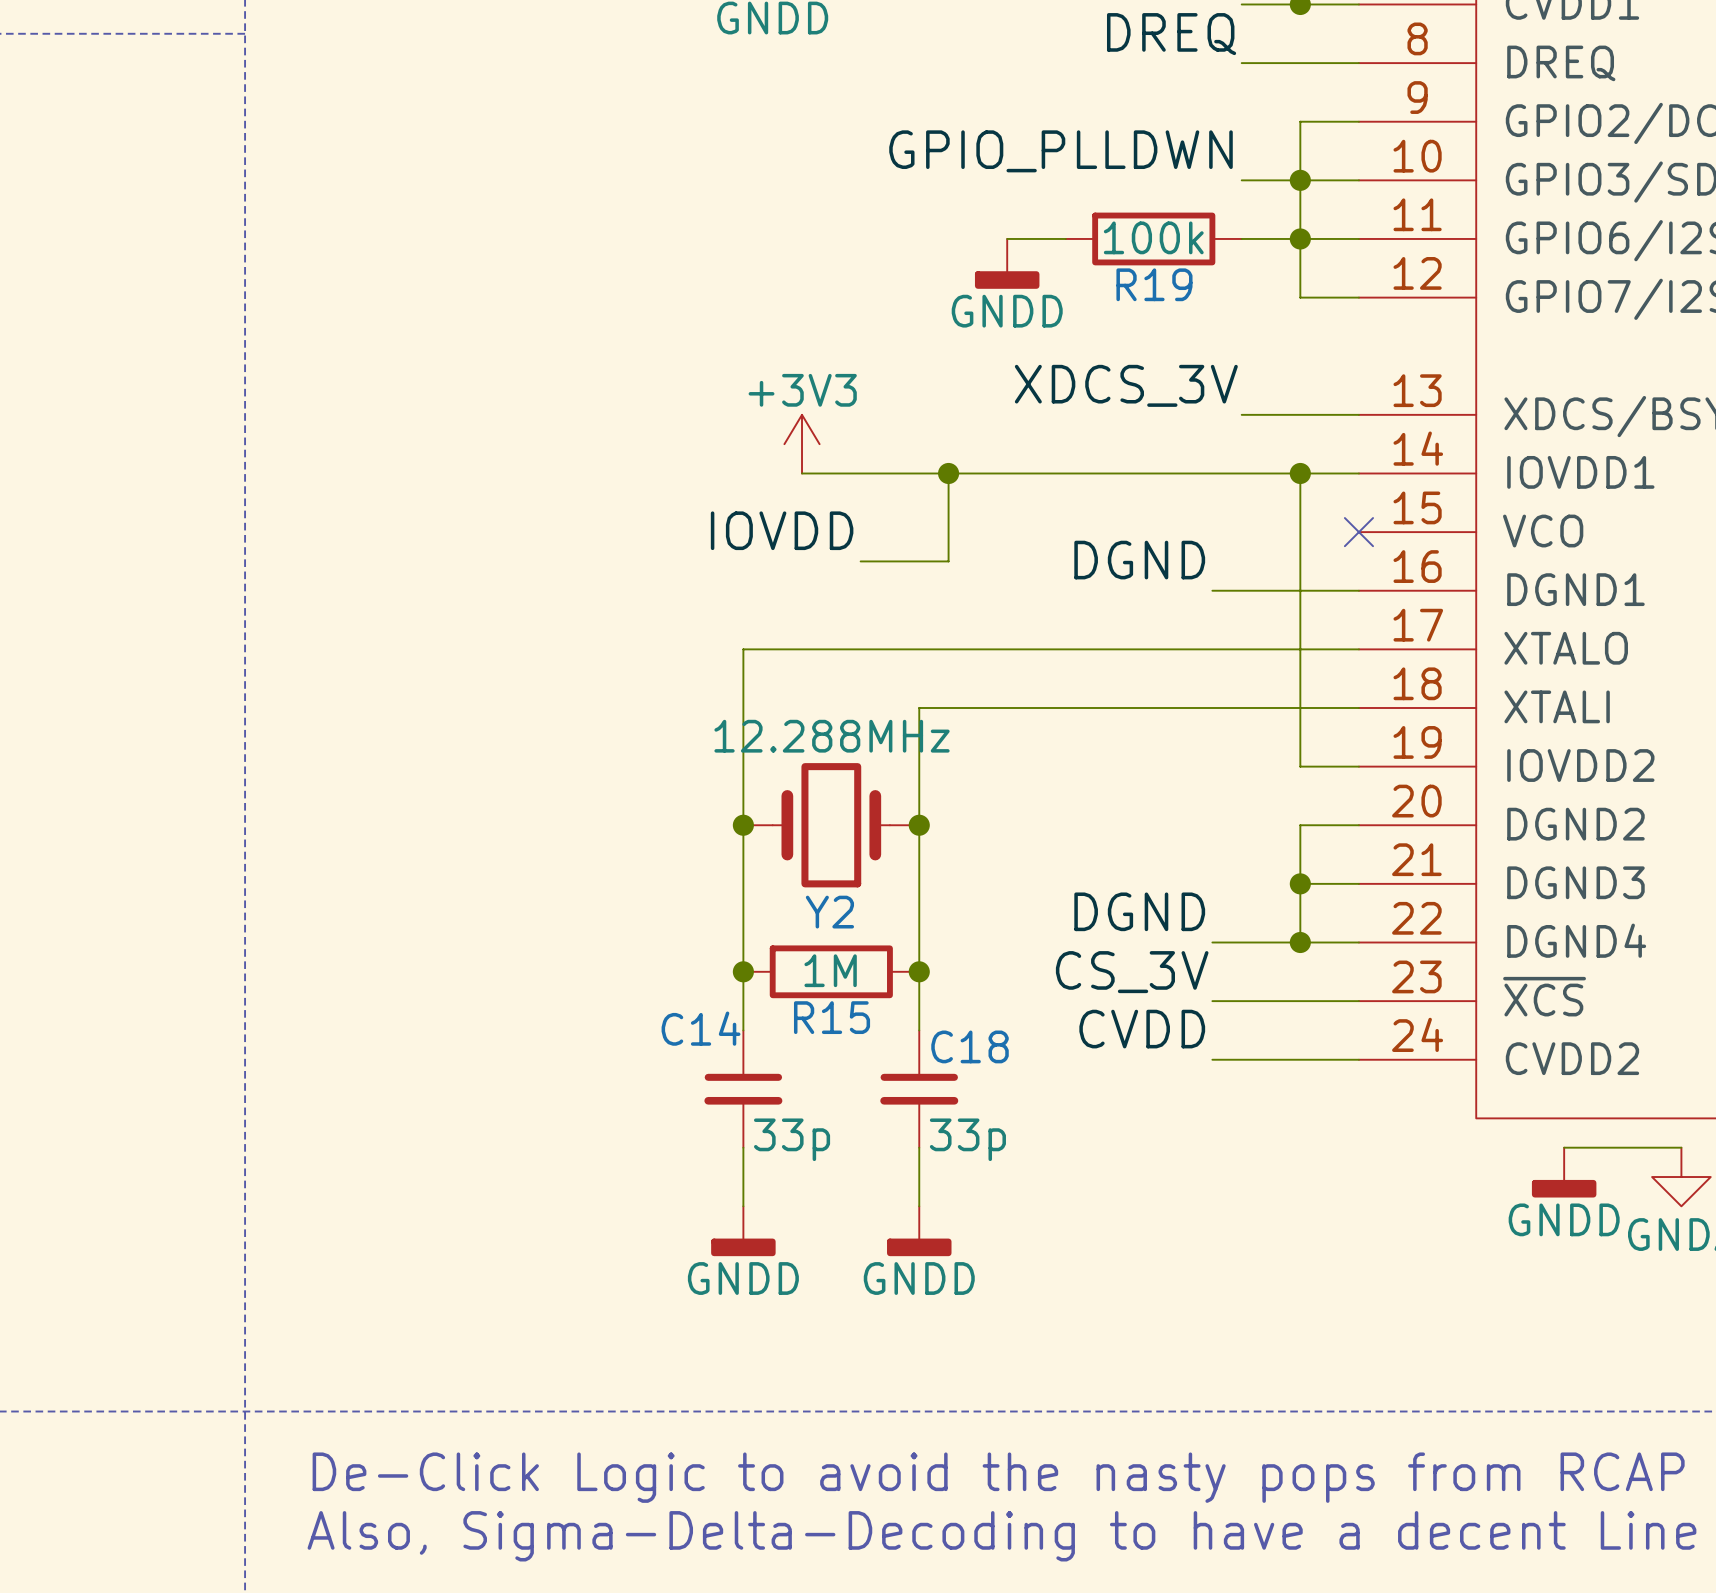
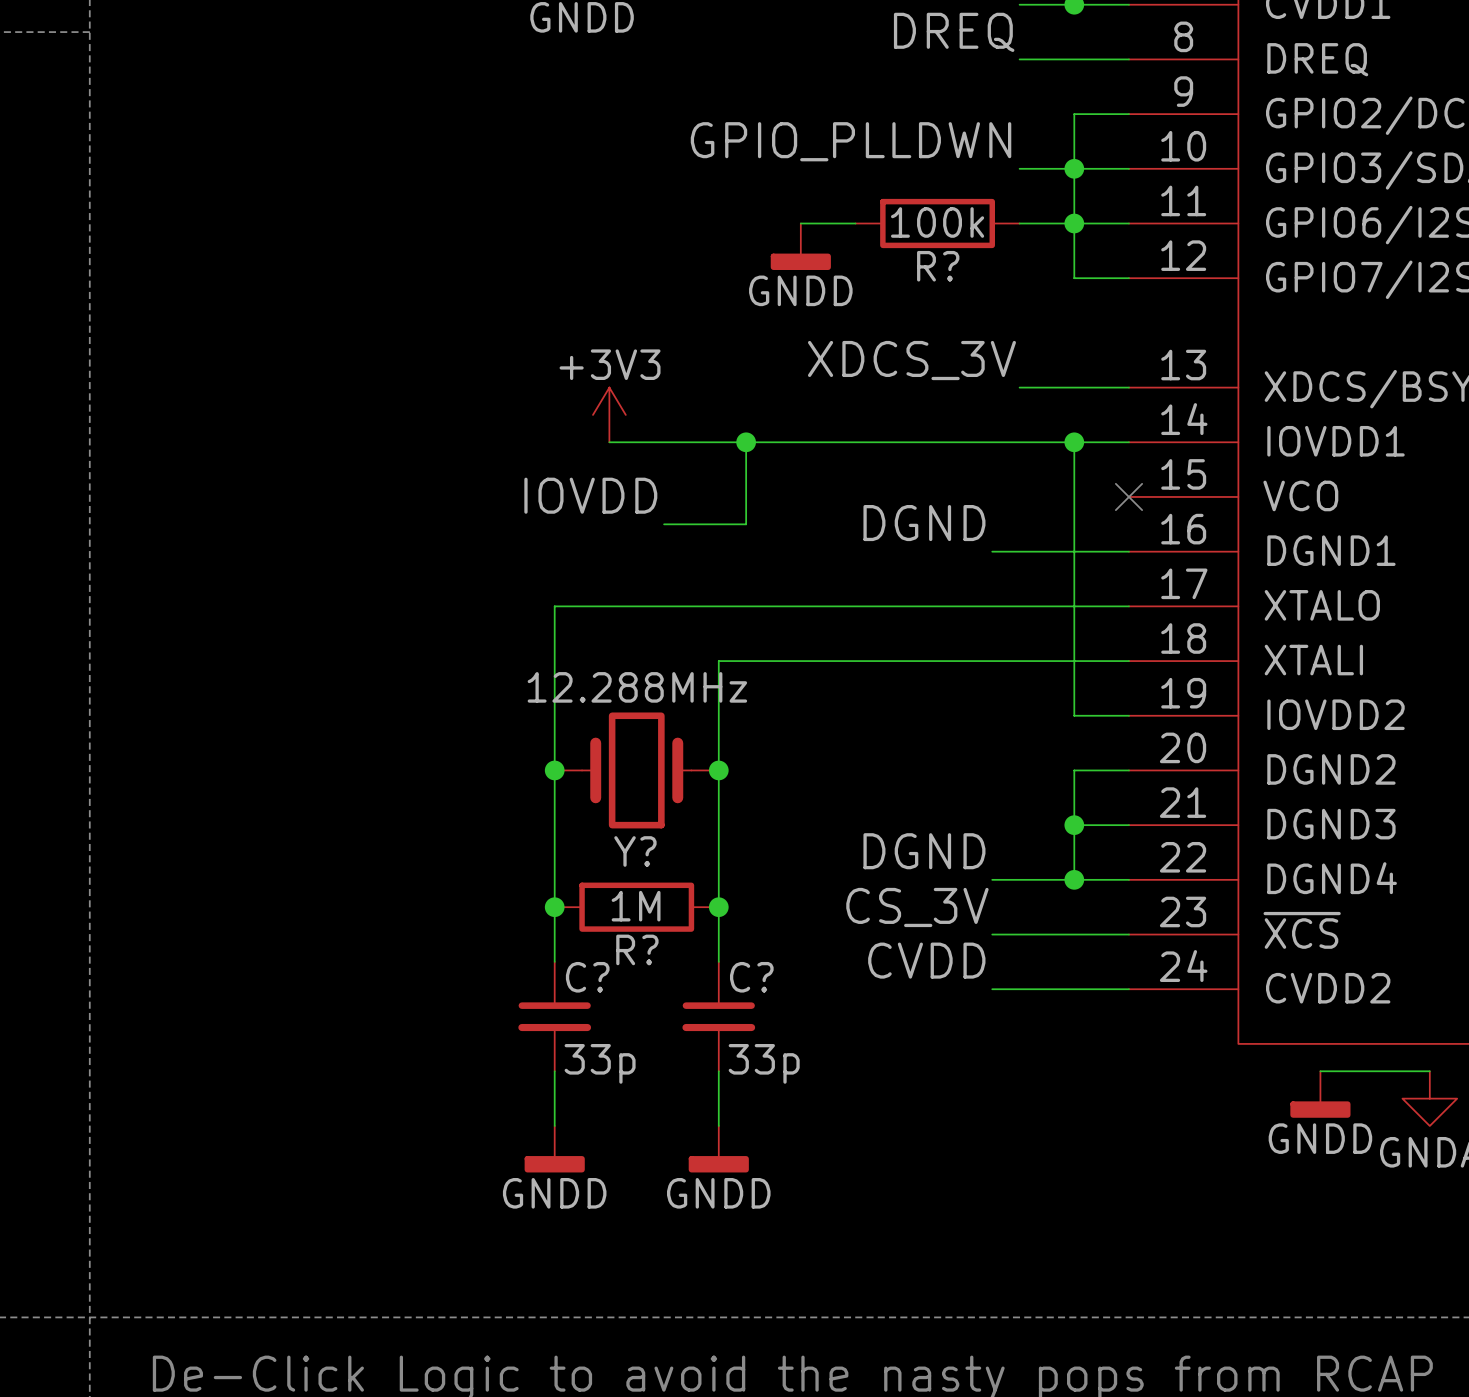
R19 name: R19 (1154, 284) -> R? (938, 266)
Y2 name: Y2 (829, 912) -> Y? (635, 851)
R15 name: R15 (832, 1017) -> R? (637, 949)
C14 name: C14 (701, 1028) -> C? (587, 977)
C18 name: C18 (970, 1046) -> C? (751, 977)

